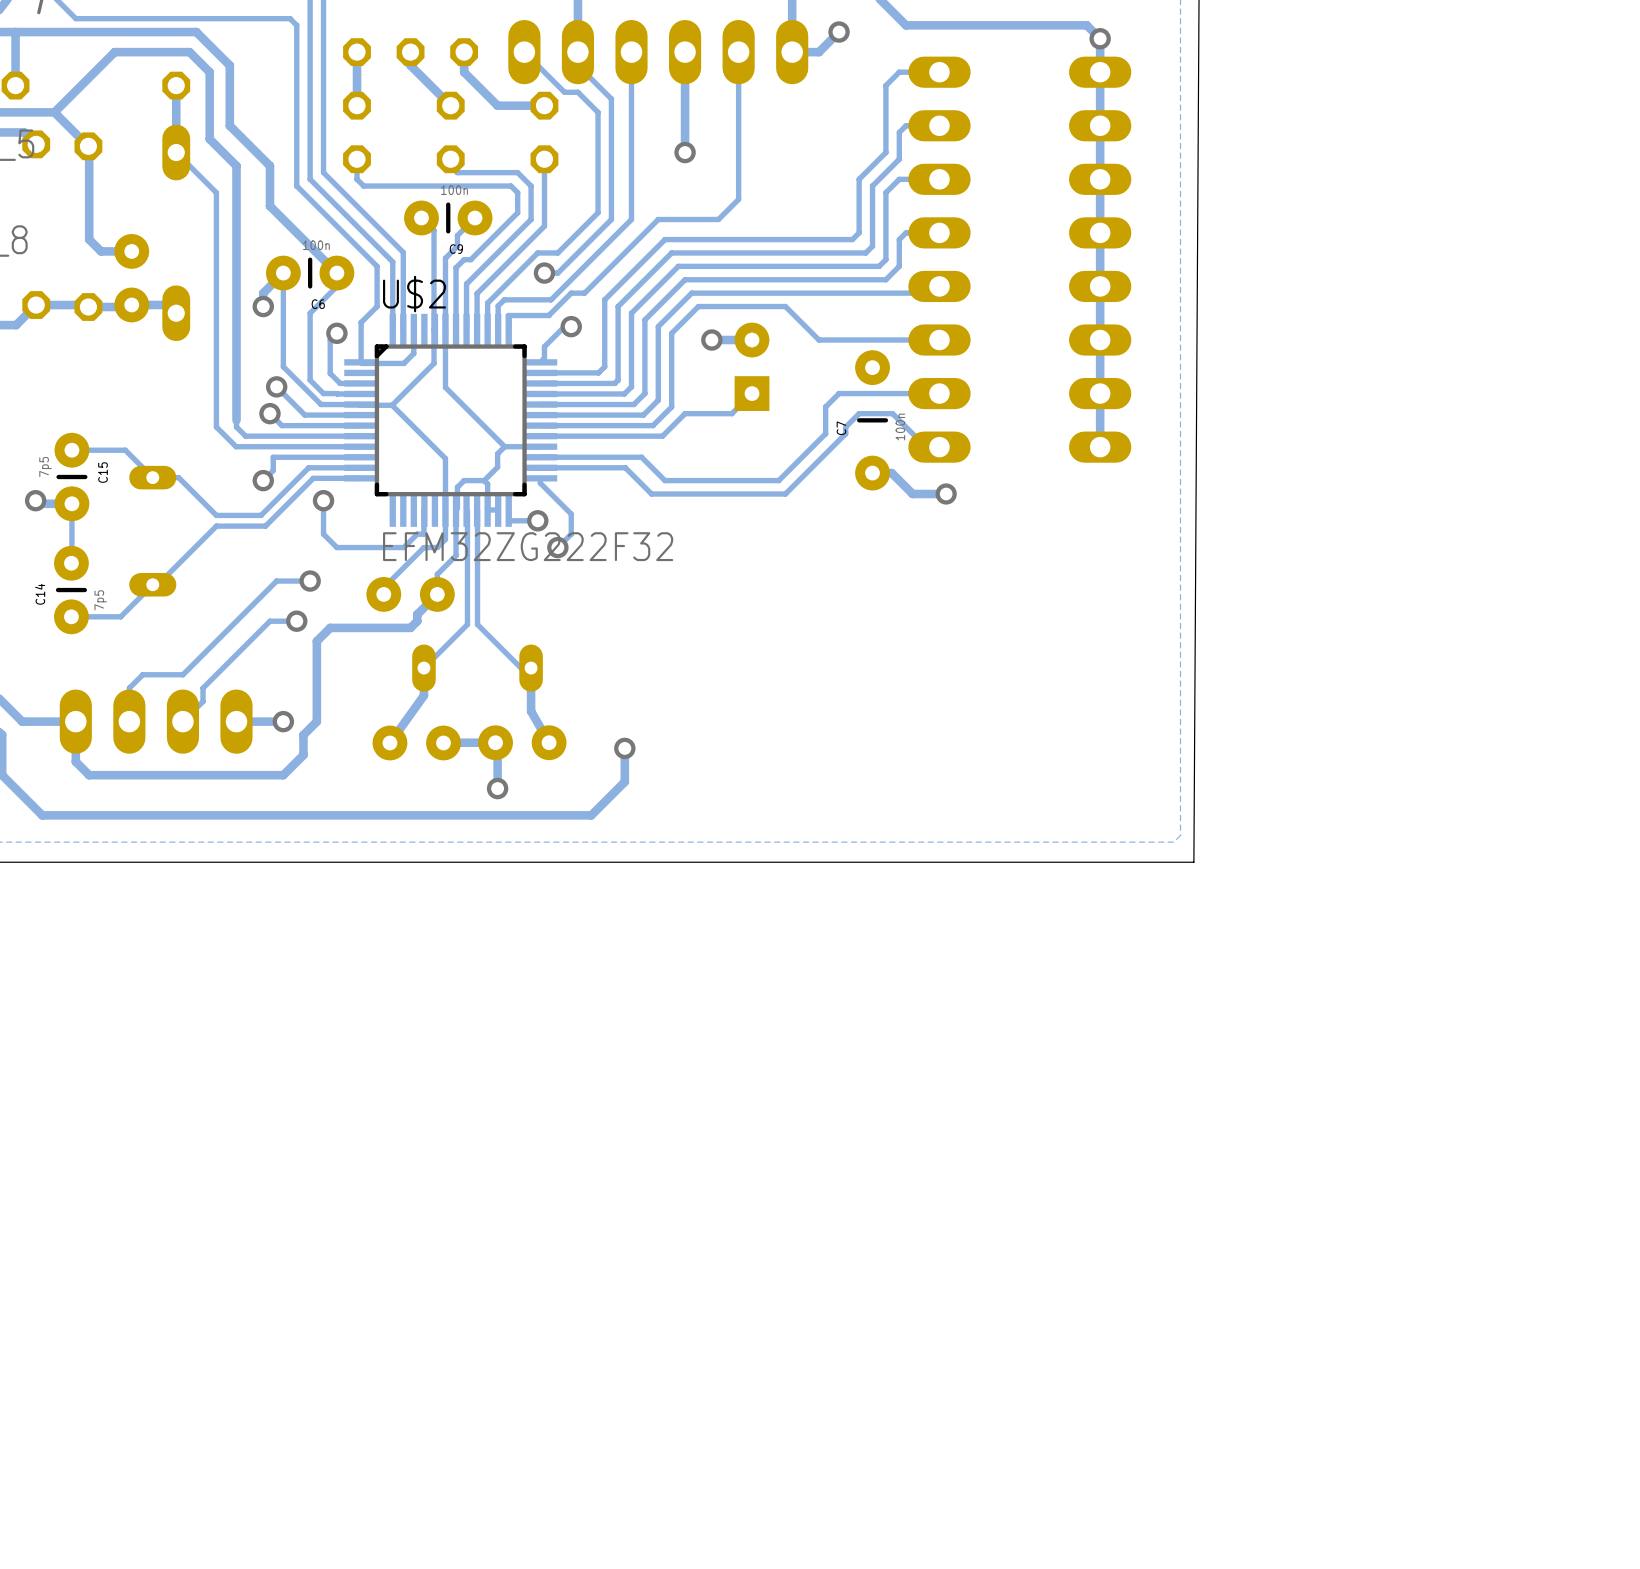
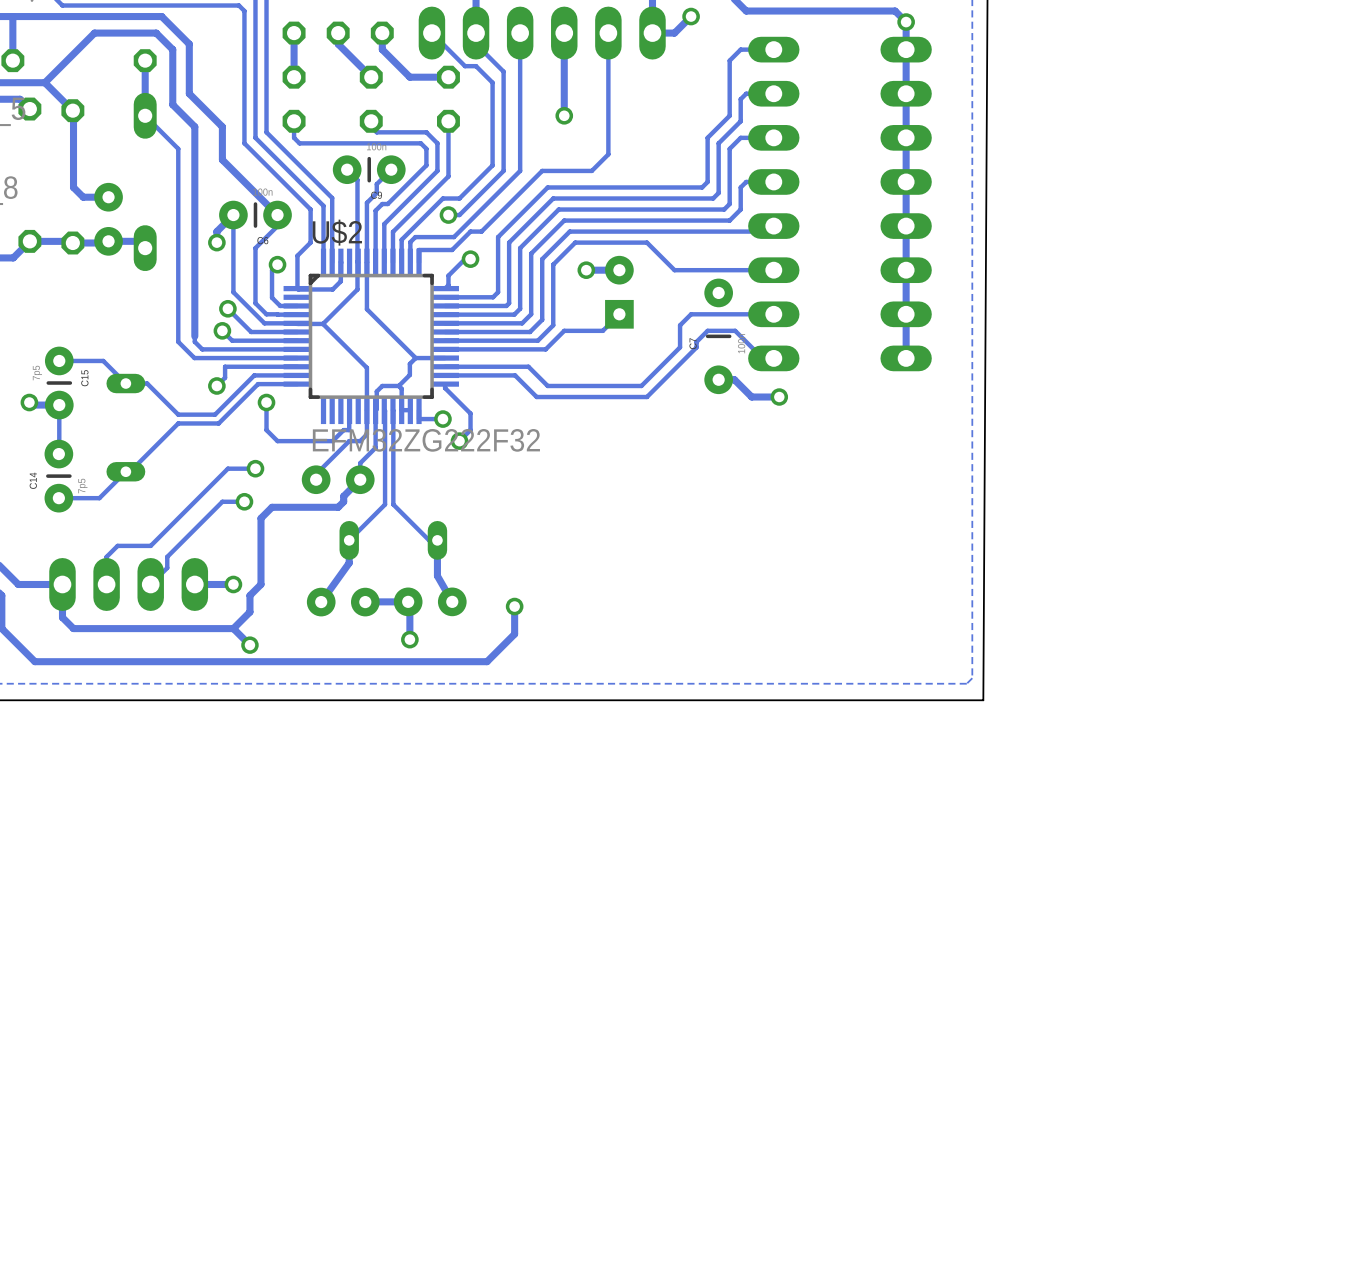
track: none -> (233, 628) (249, 645)
via: none -> (249, 645)

